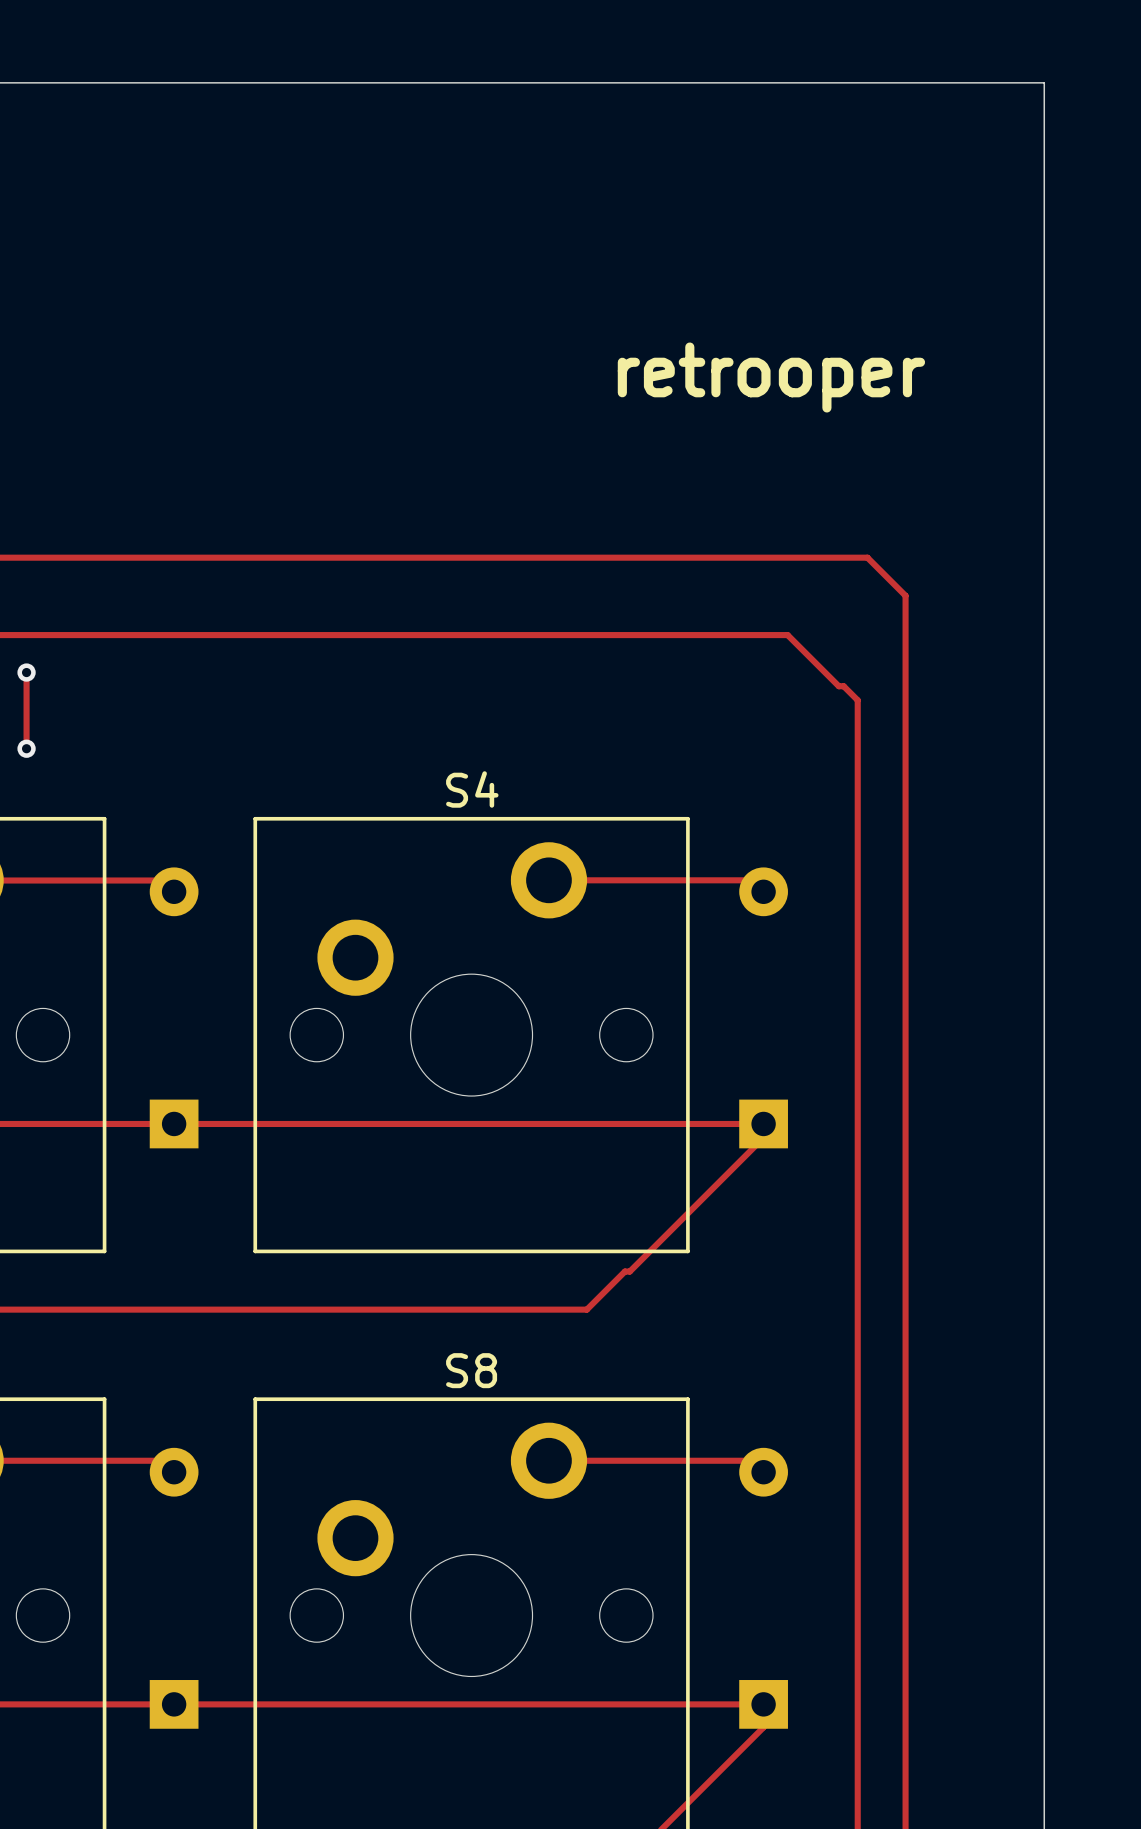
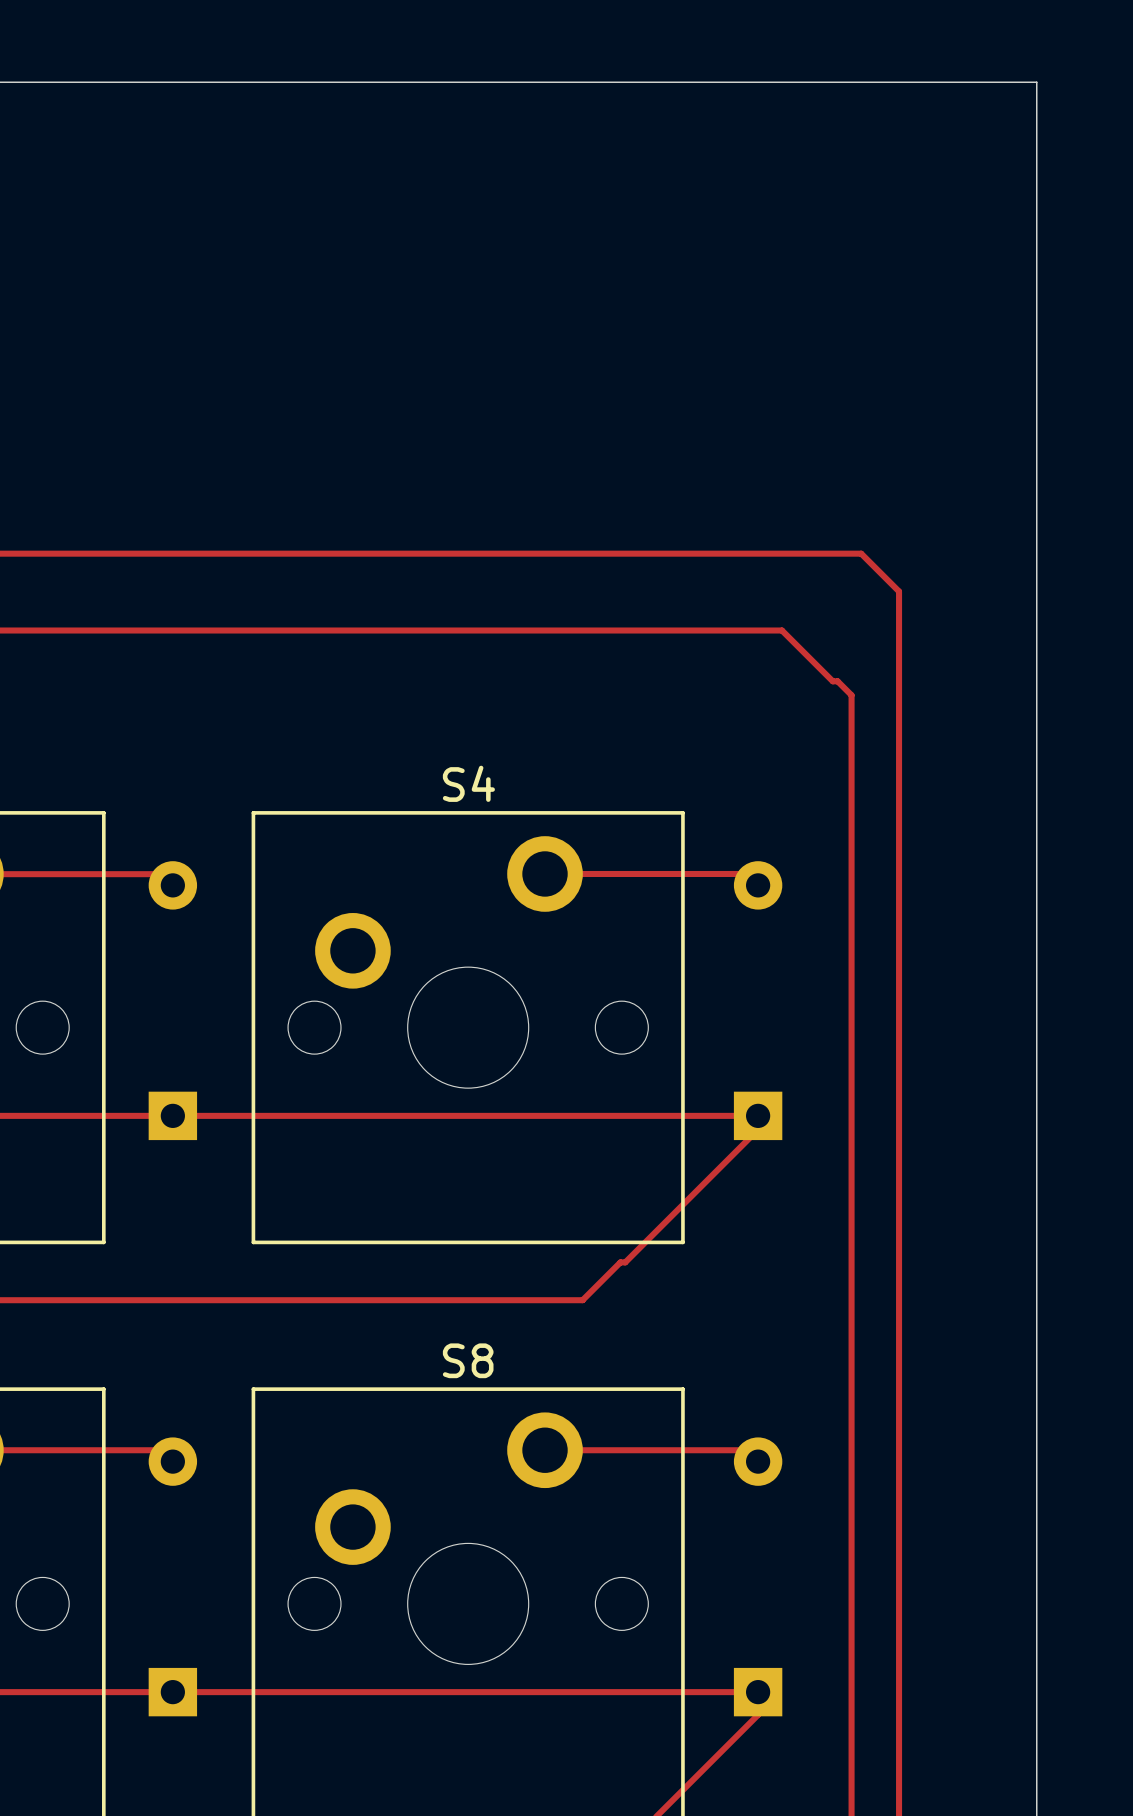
text: retrooper (771, 377) -> none
track: (26, 672) (26, 748) -> none
via: (26, 672) -> none
via: (26, 748) -> none

